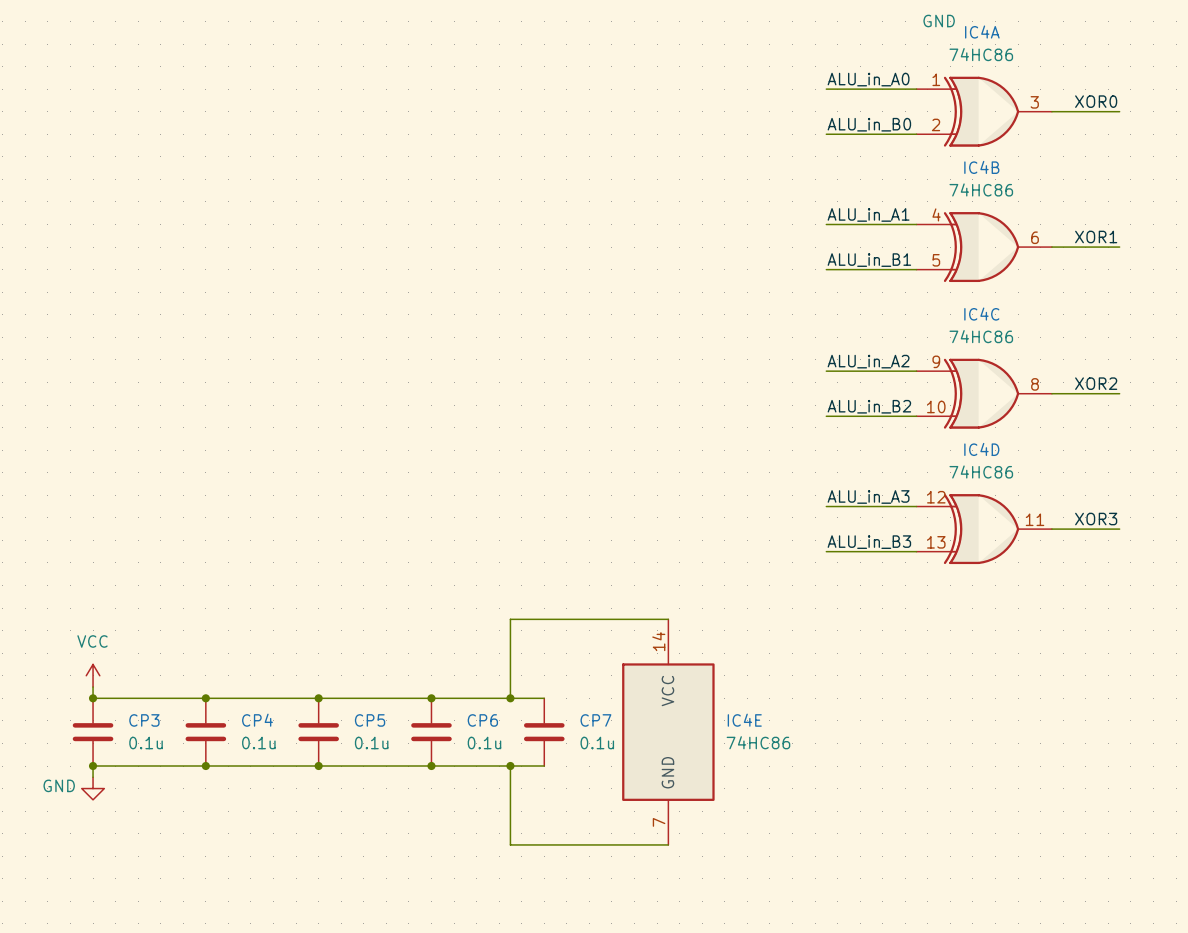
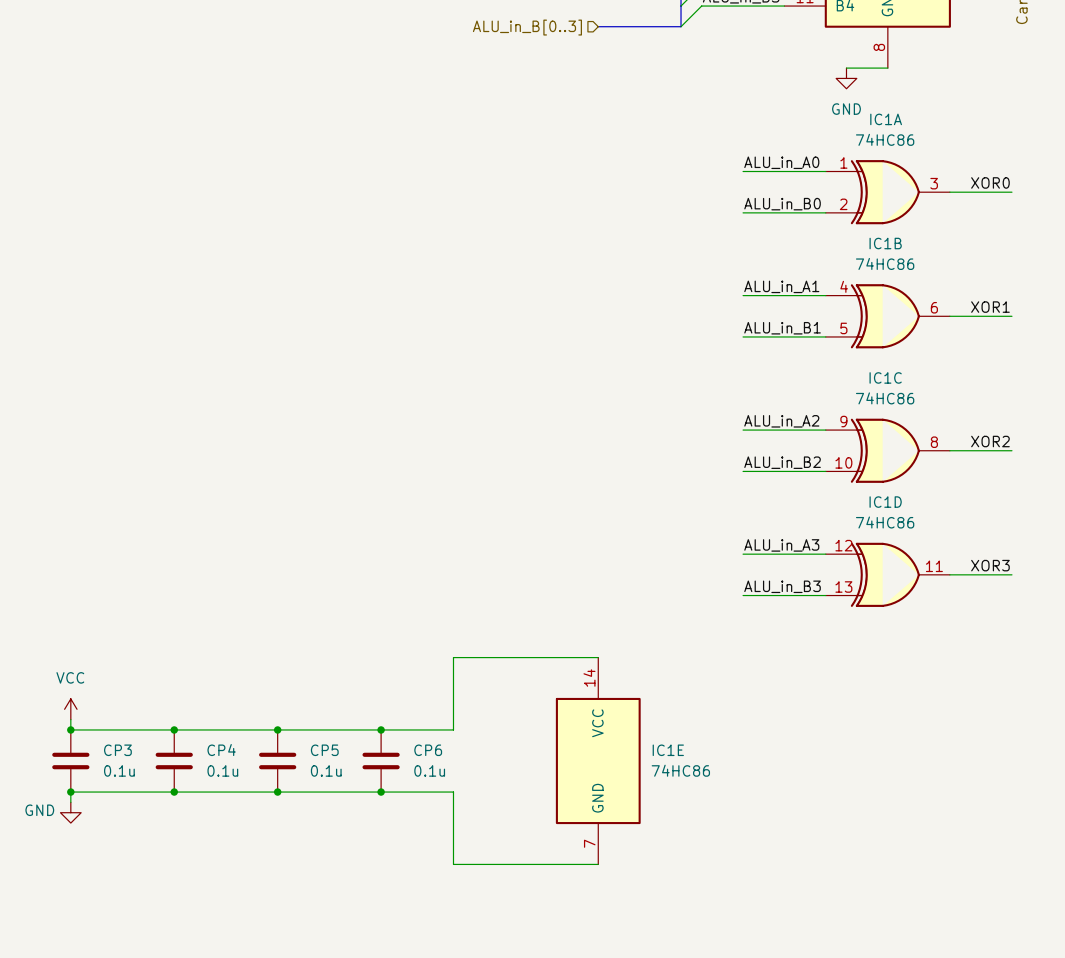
IC4A name: IC4A (982, 32) -> IC1A (886, 119)
IC4B name: IC4B (981, 167) -> IC1B (885, 243)
IC4C name: IC4C (981, 314) -> IC1C (885, 377)
IC4D name: IC4D (981, 449) -> IC1D (885, 502)
wire: (510, 698) (544, 698) -> none
junction: (510, 698) -> none
IC4E name: IC4E (744, 720) -> IC1E (668, 750)
CP7: 0.1u (544, 732) -> none
wire: (510, 766) (544, 766) -> none
junction: (510, 766) -> none

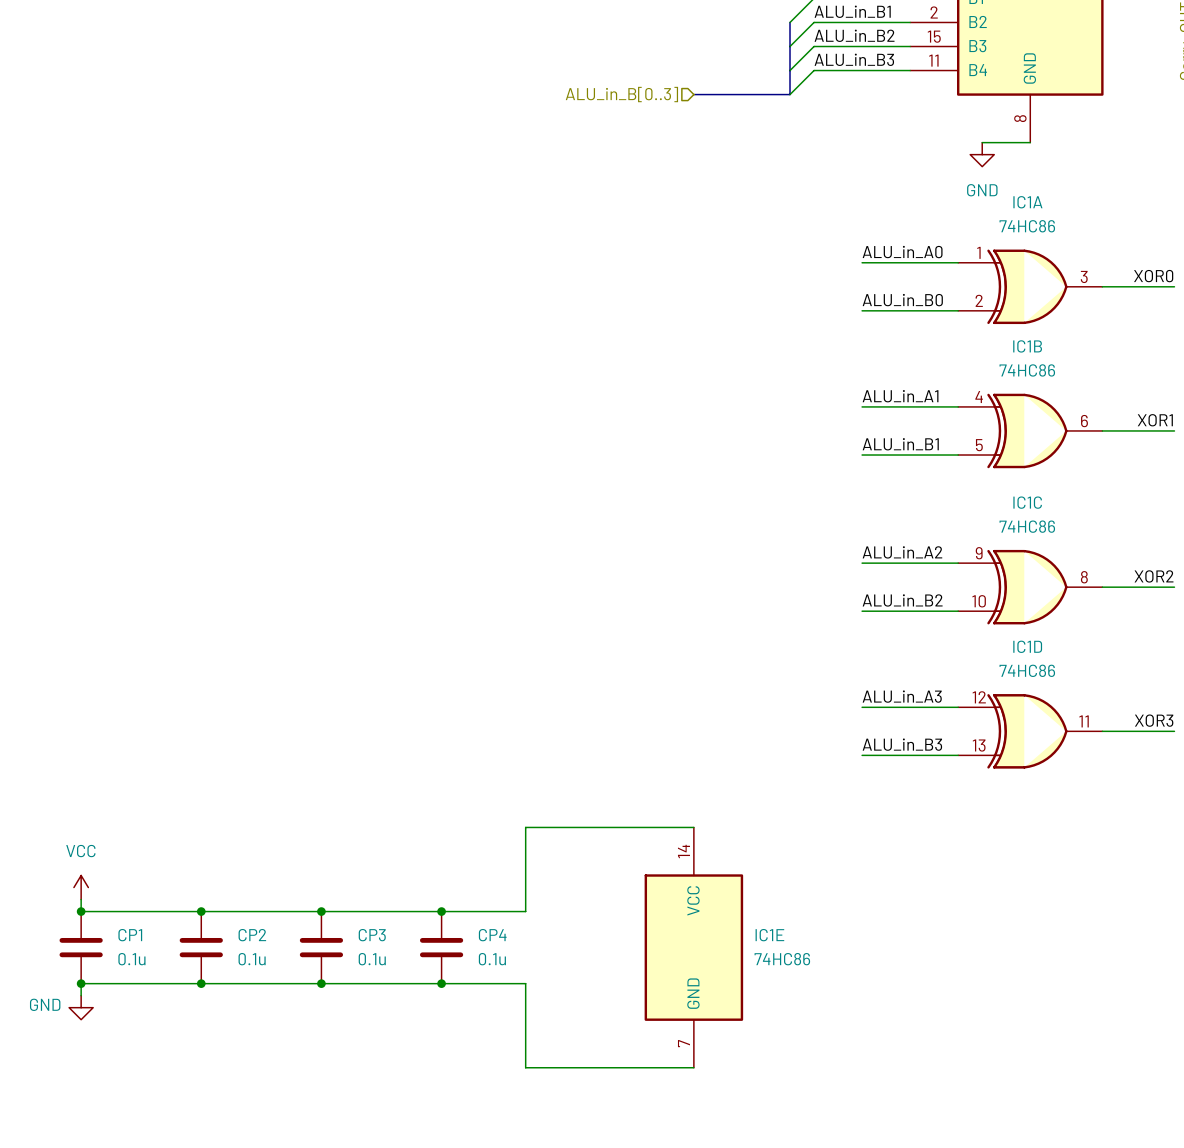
CP3 name: CP3 (117, 750) -> CP1 (130, 935)
CP4 name: CP4 (221, 750) -> CP2 (252, 935)
CP5 name: CP5 (324, 750) -> CP3 (372, 935)
CP6 name: CP6 (428, 750) -> CP4 (492, 935)

